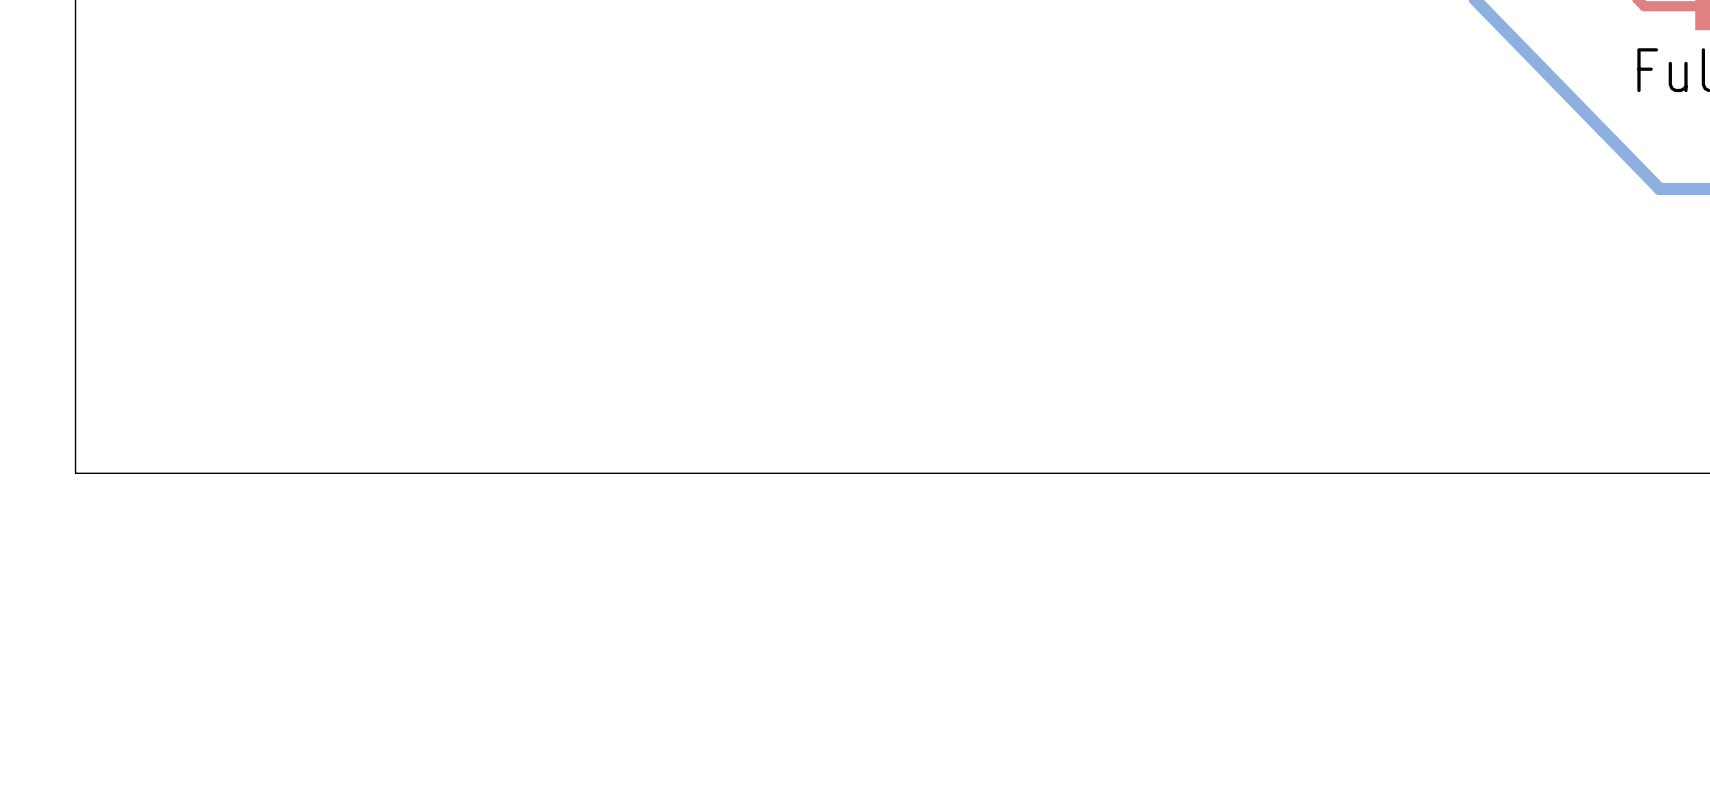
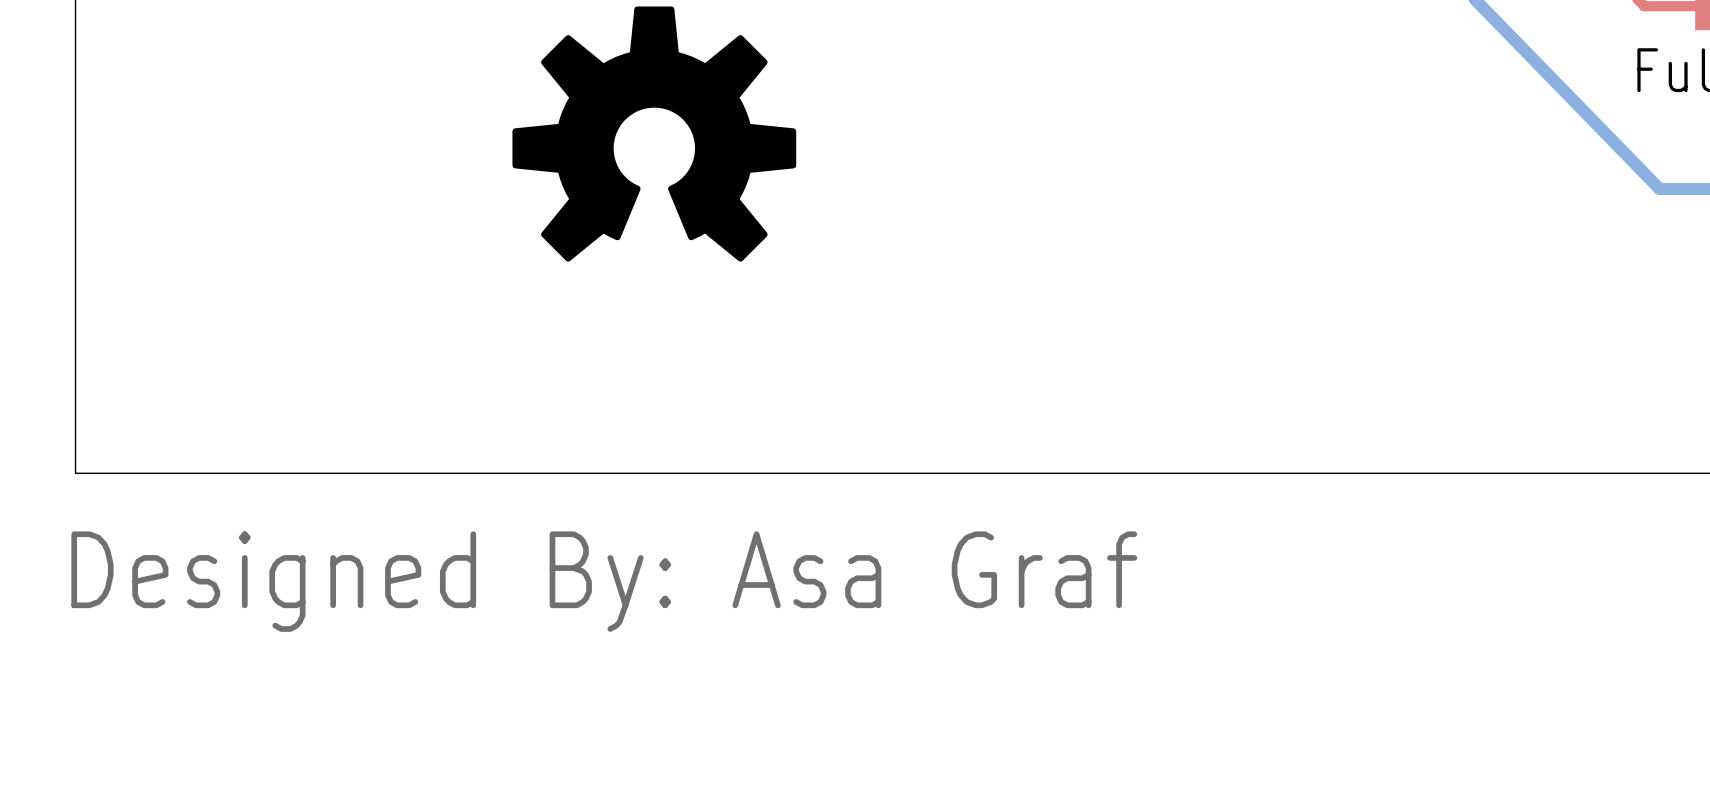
drawing: none -> [512, 6, 797, 262]
text: none -> Designed By: Asa Graf (604, 581)

